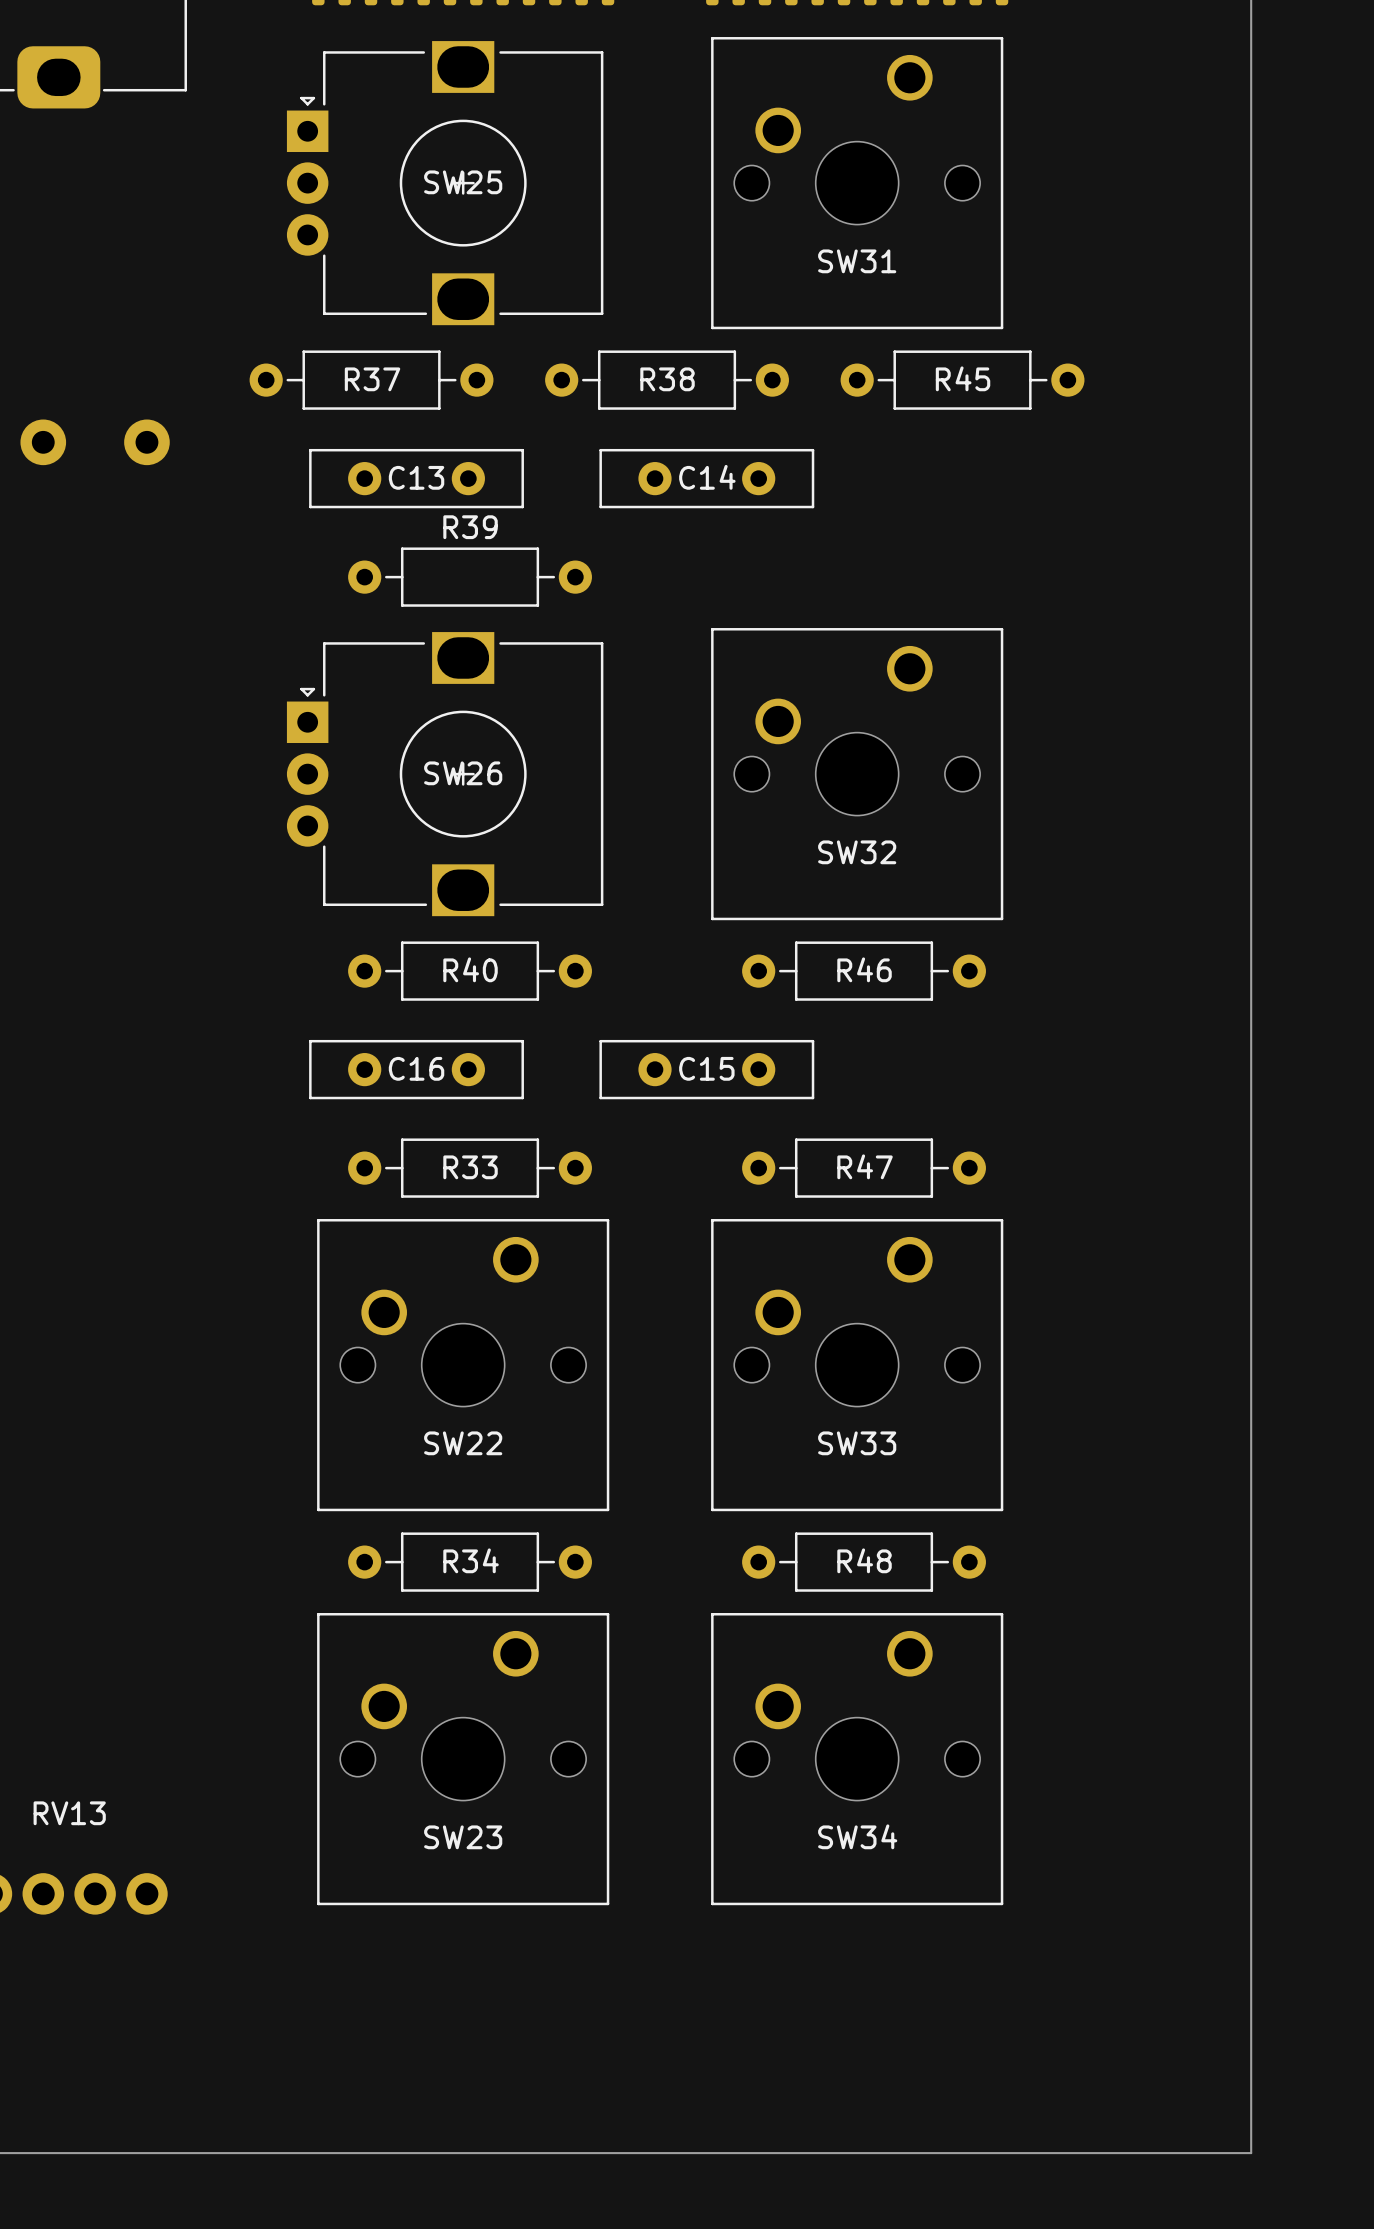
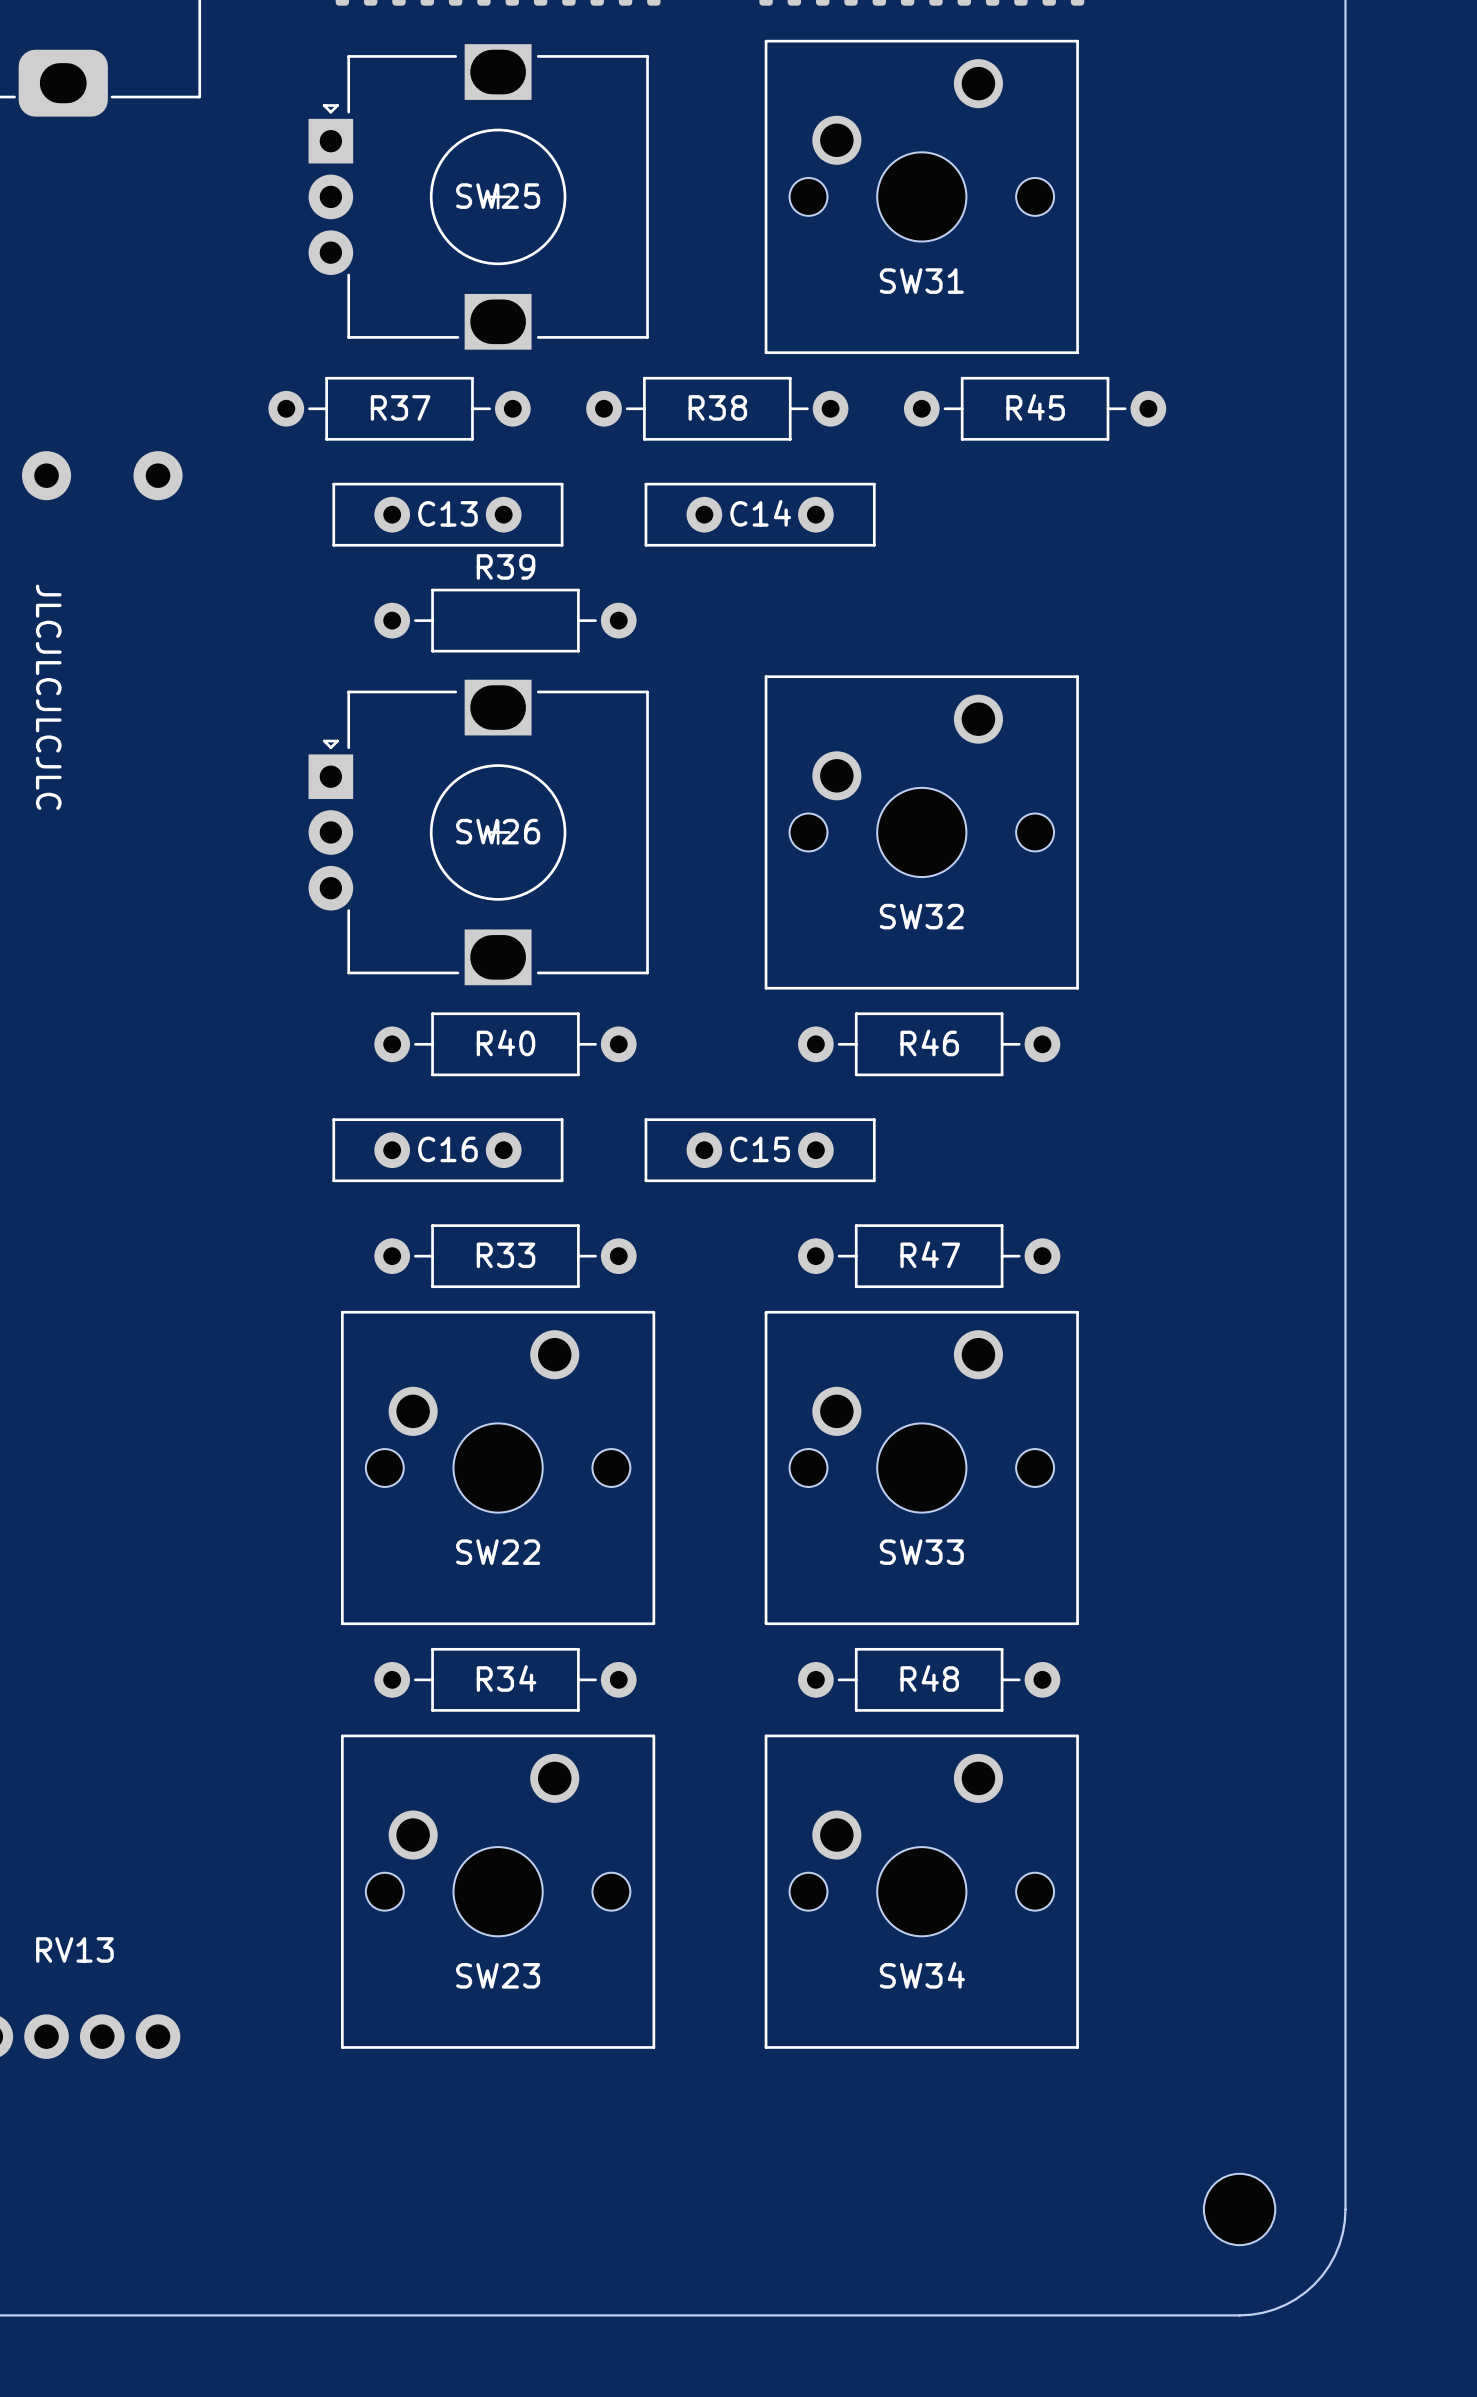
text: none -> JLCJLCJLCJLC (48, 697)
part: none -> (1239, 2209)
board edge: (1251, 2054) (1251, 2153) (1152, 2153) -> (1345, 2209) (1339, 2244) (1329, 2265) (1314, 2284) (1285, 2304) (1263, 2312) (1239, 2315)

